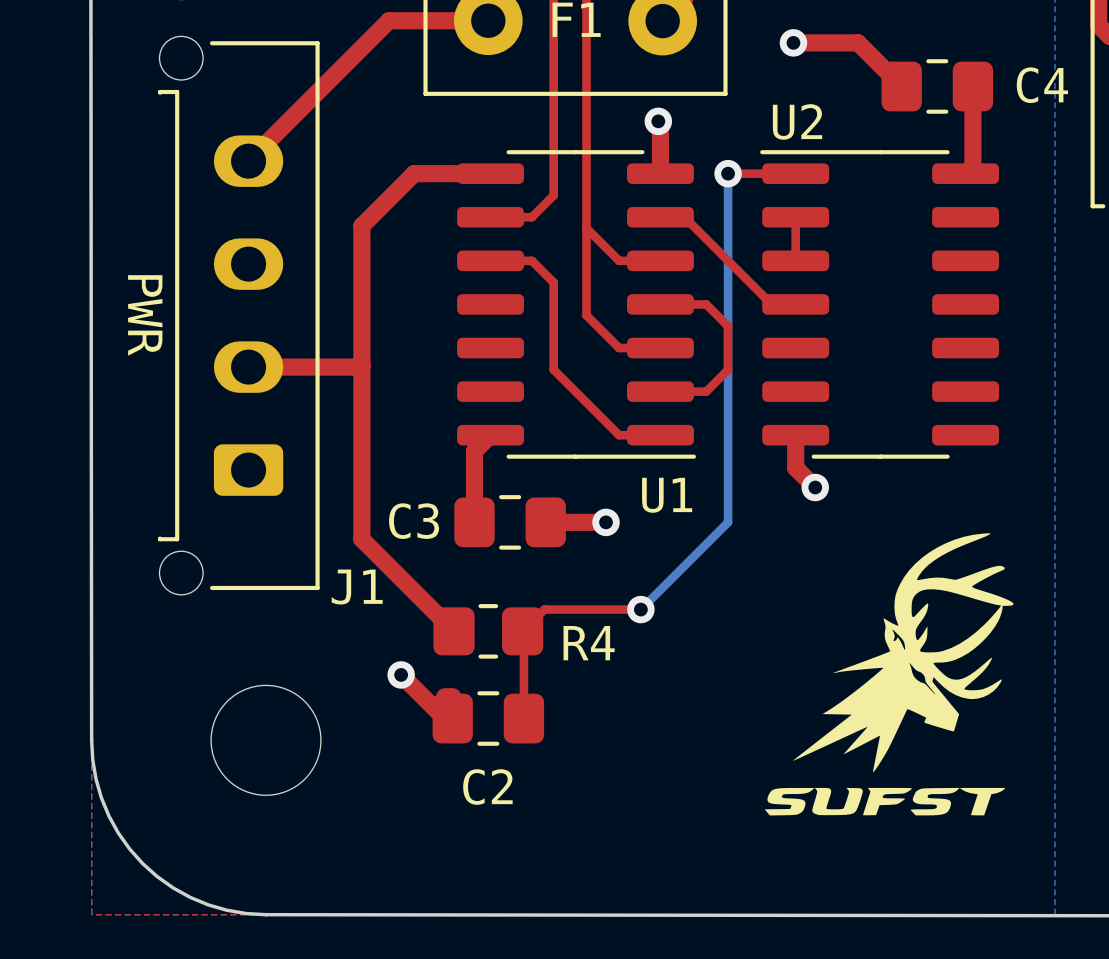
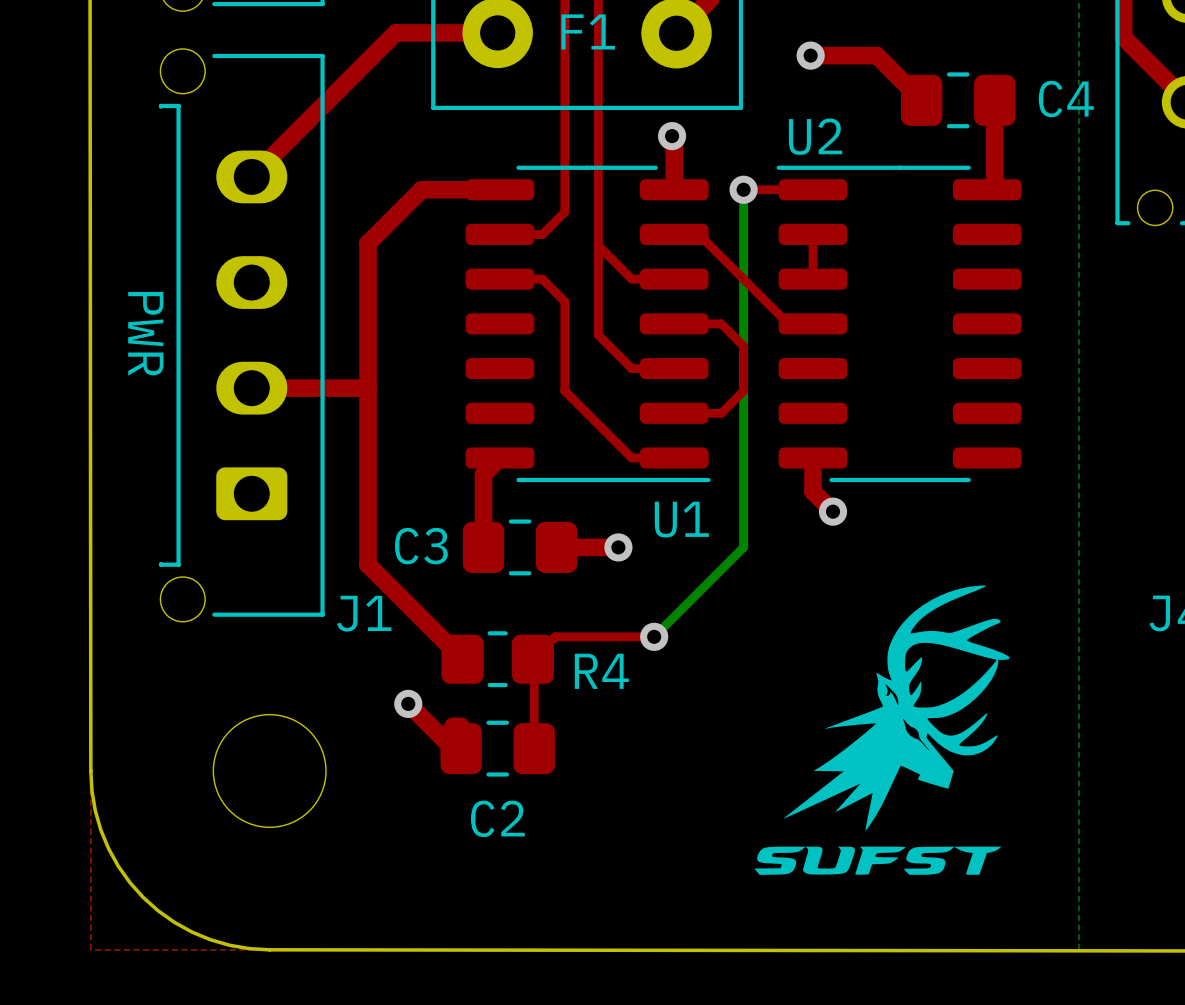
drawing position: (903, 652) -> (896, 708)
drawing position: (885, 801) -> (877, 860)

